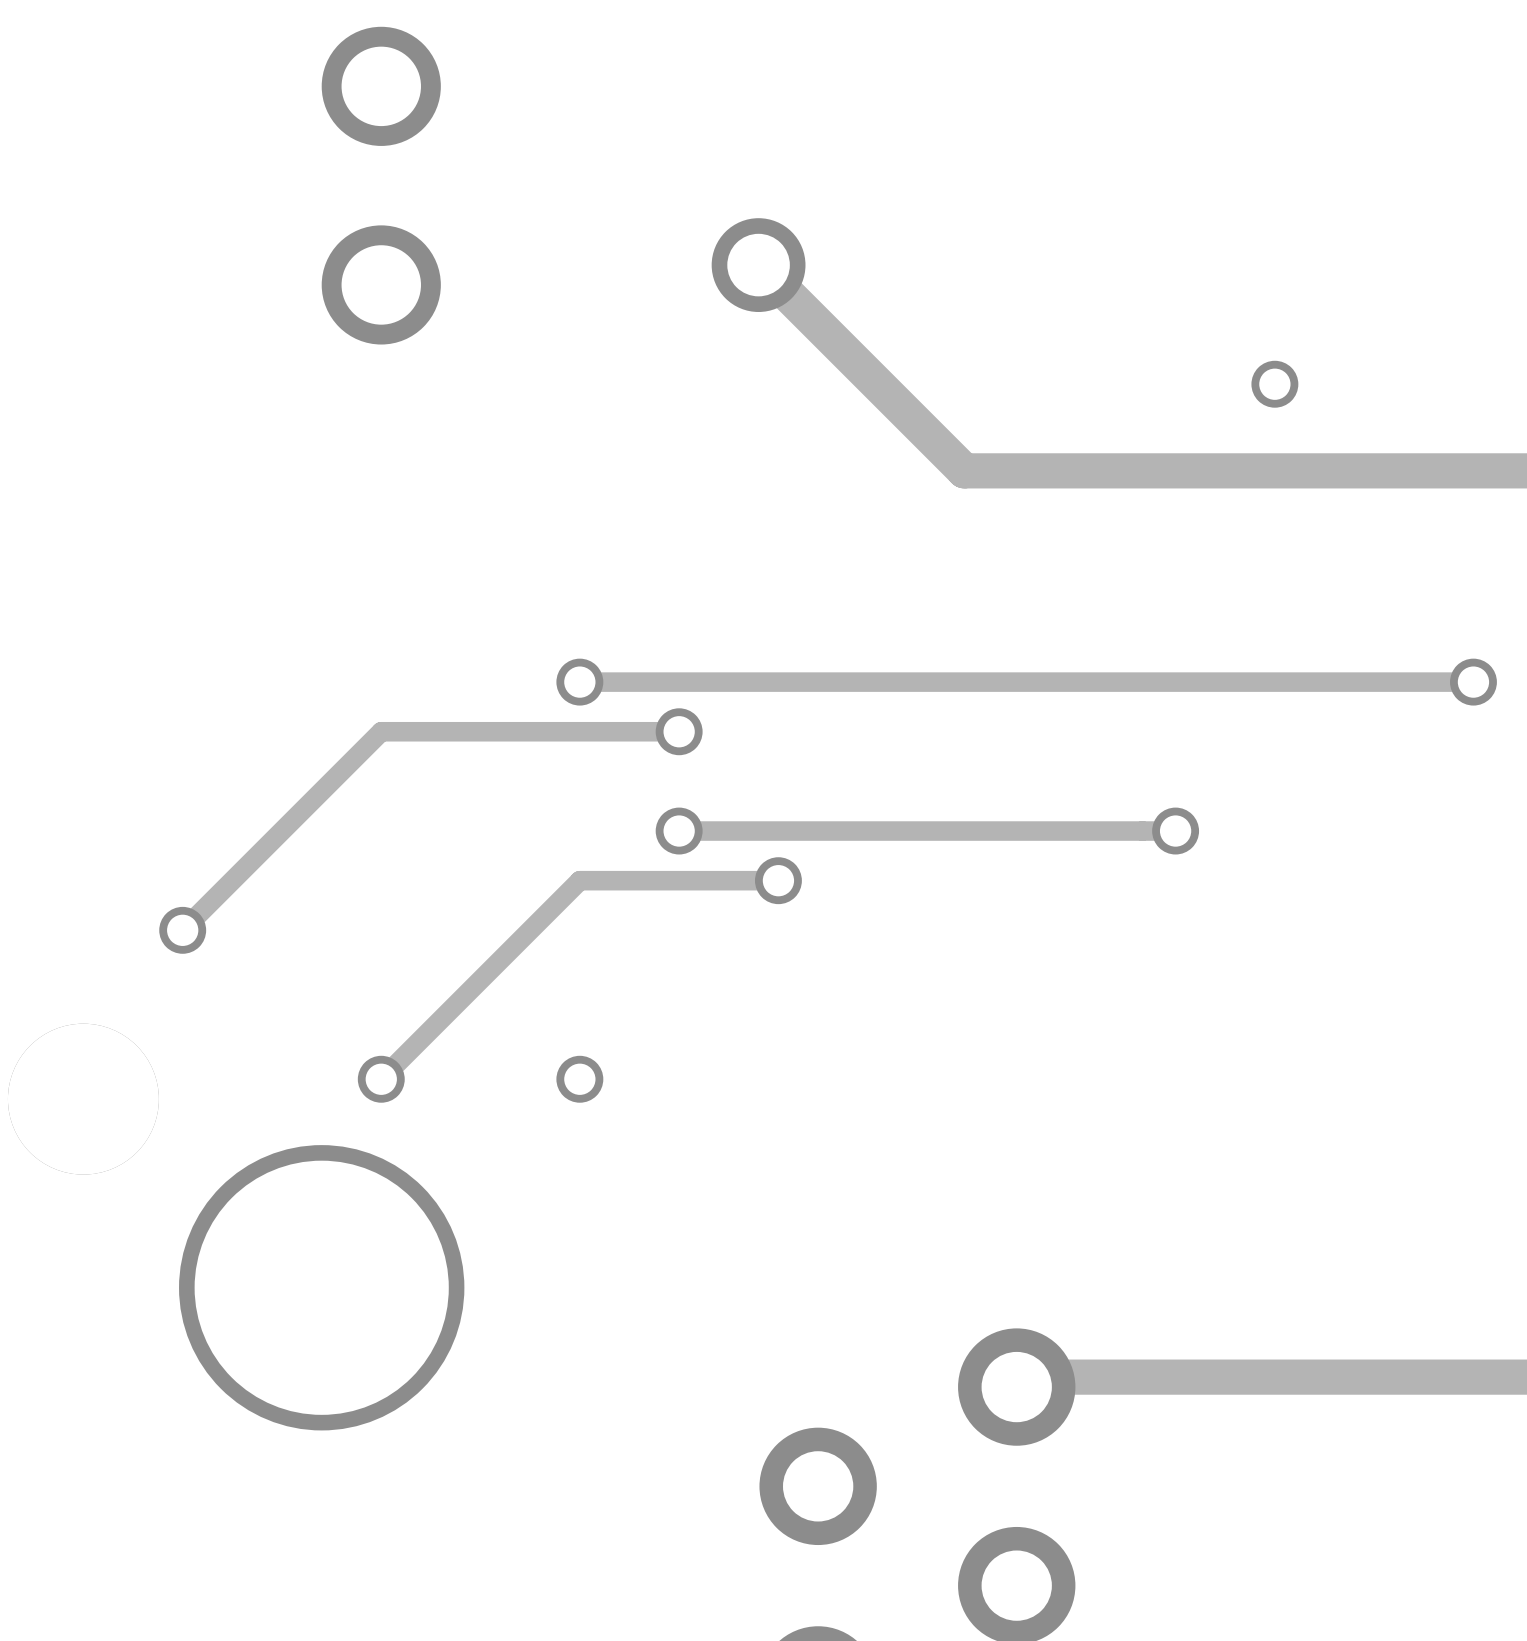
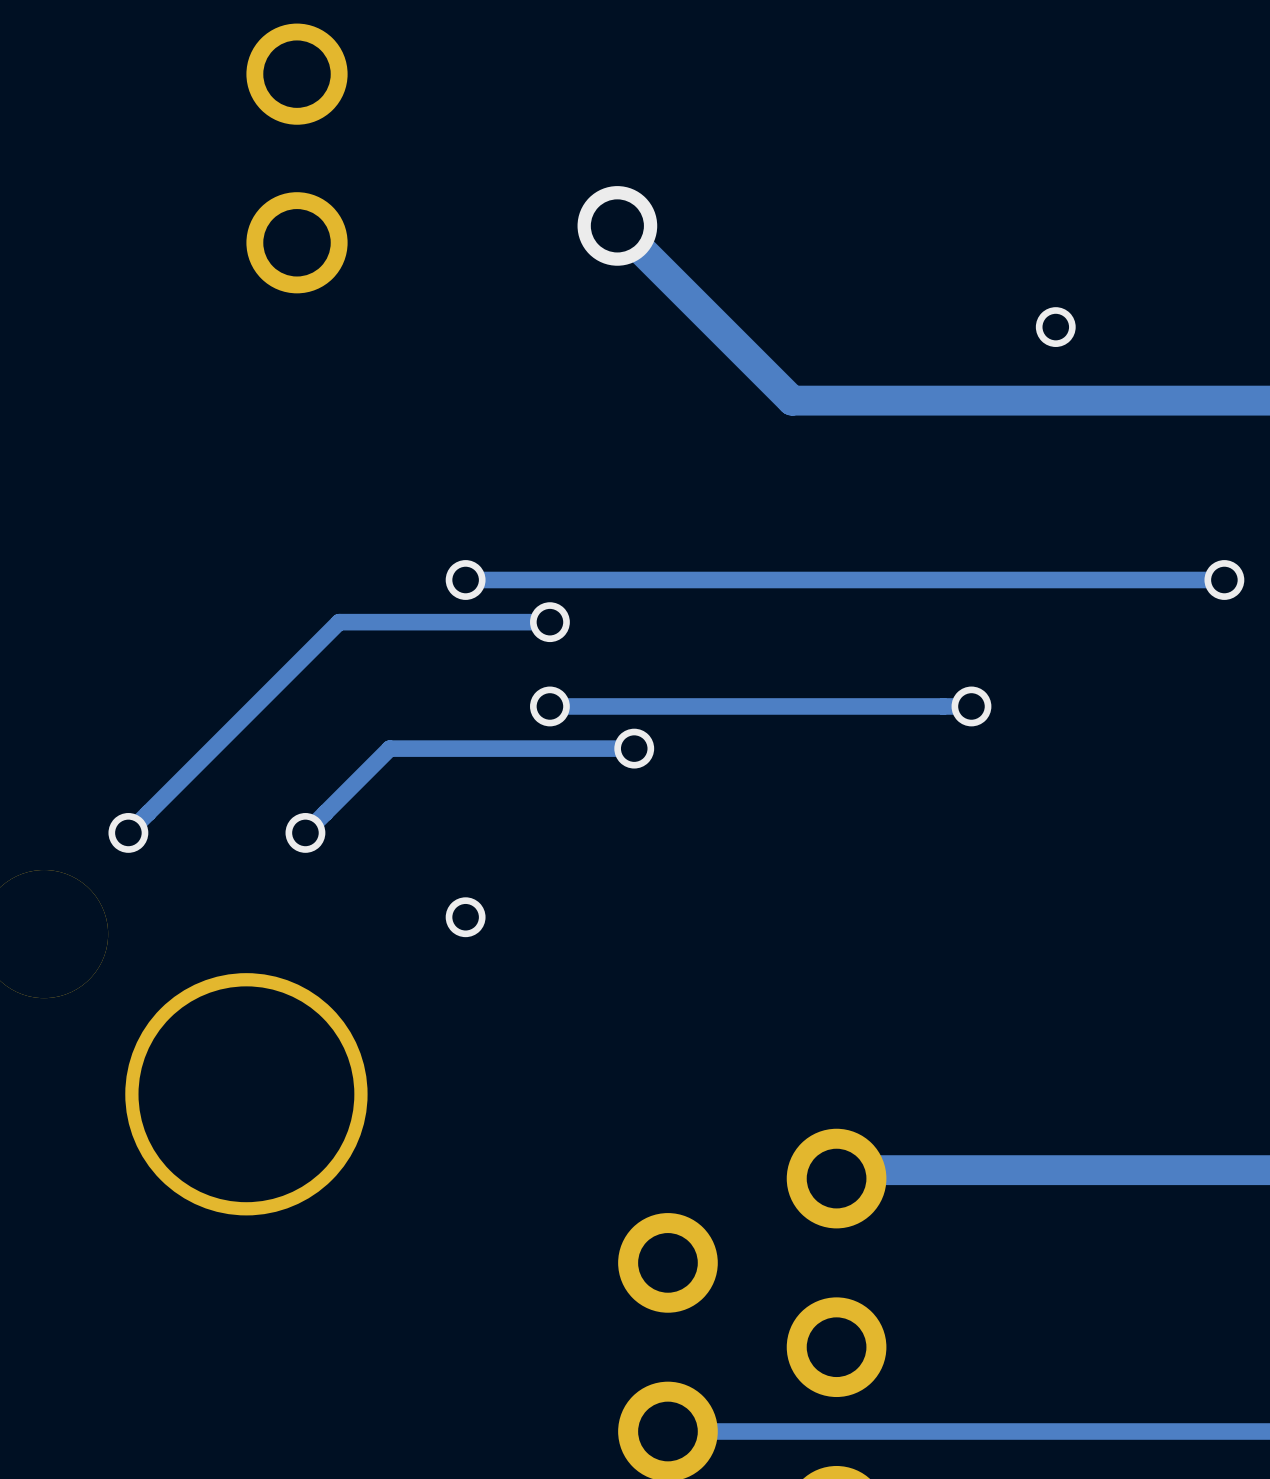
track: (430, 731) (381, 731) (182, 930) -> (339, 622) (128, 832)
track: (579, 880) (381, 1079) -> (465, 748) (389, 748) (305, 832)
via position: (182, 930) -> (128, 832)
via position: (381, 1079) -> (305, 832)

